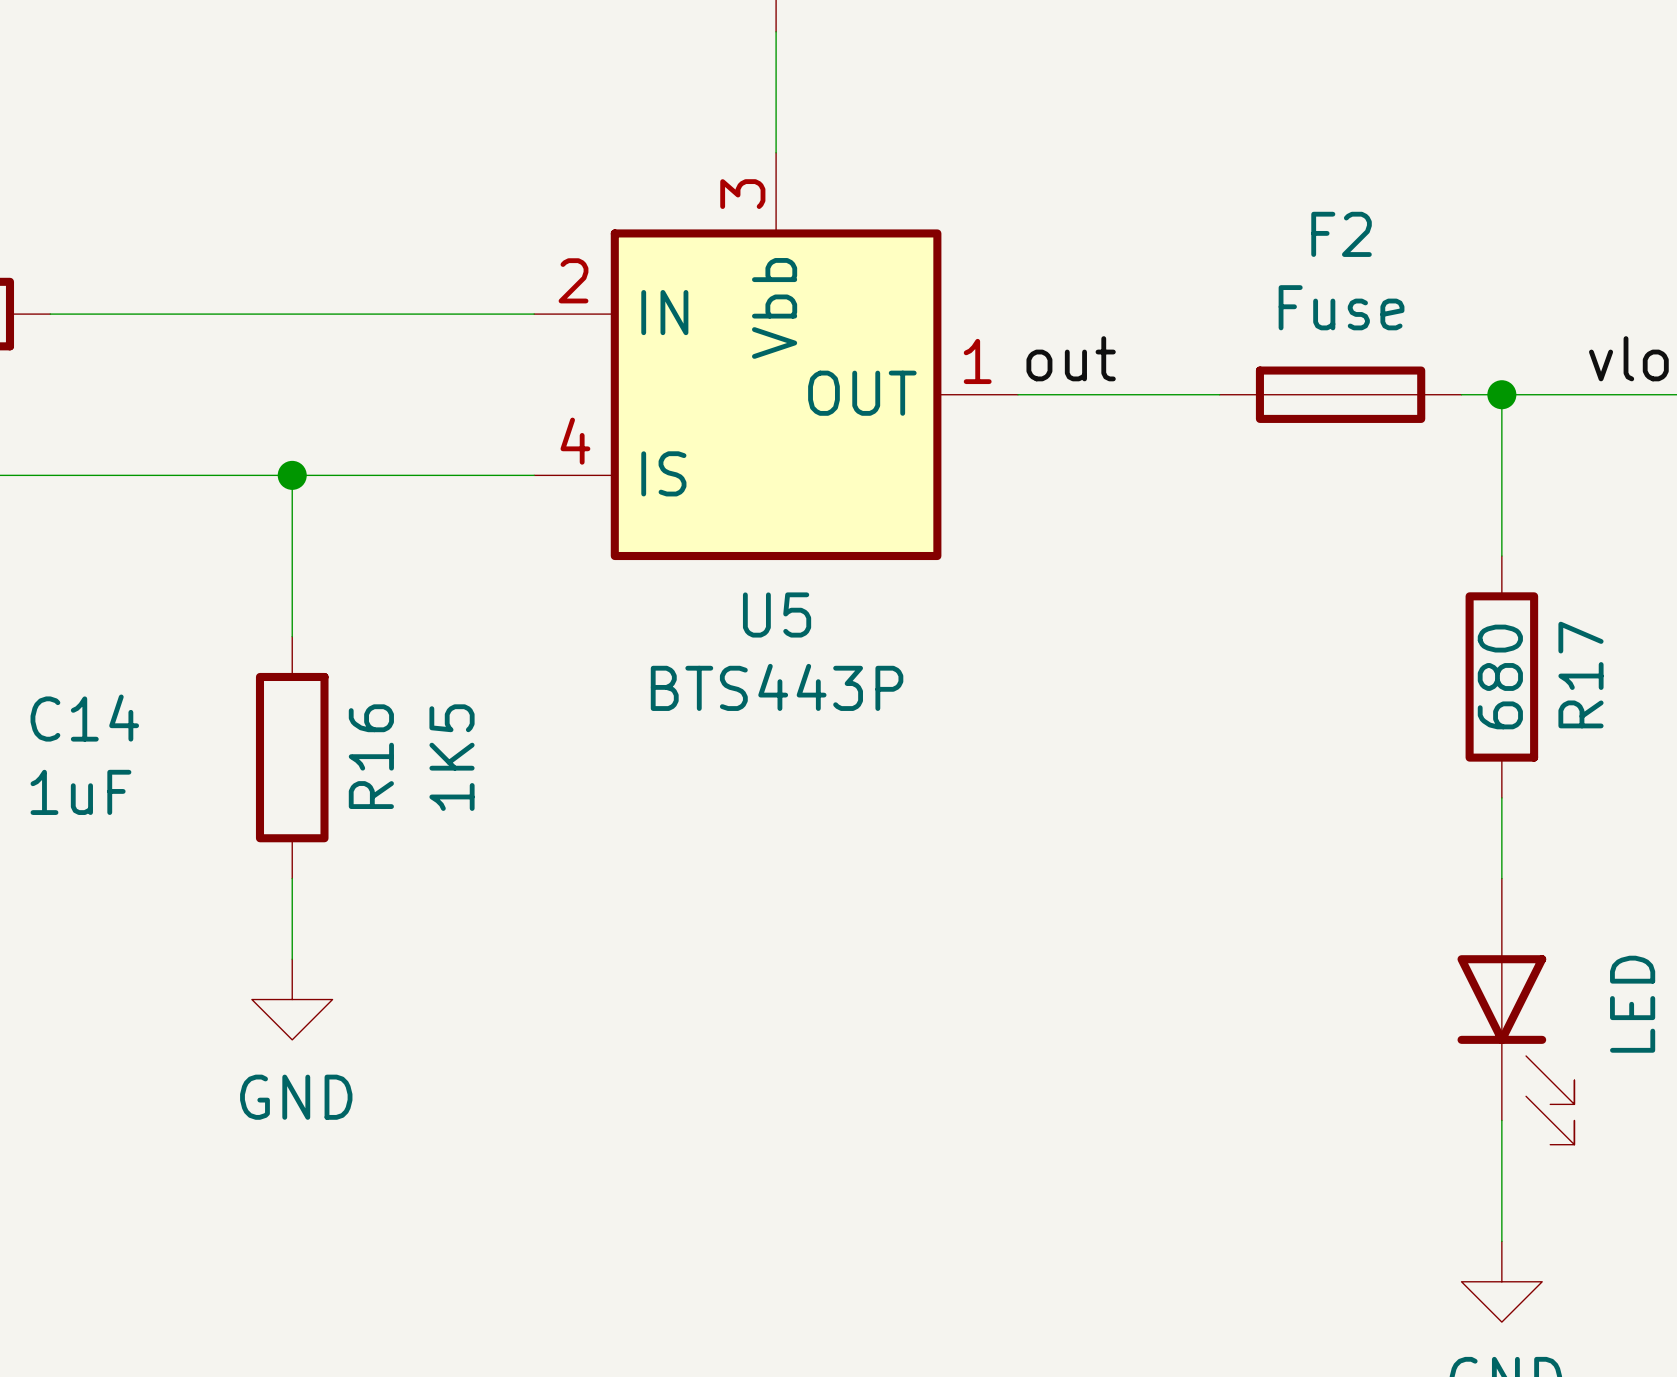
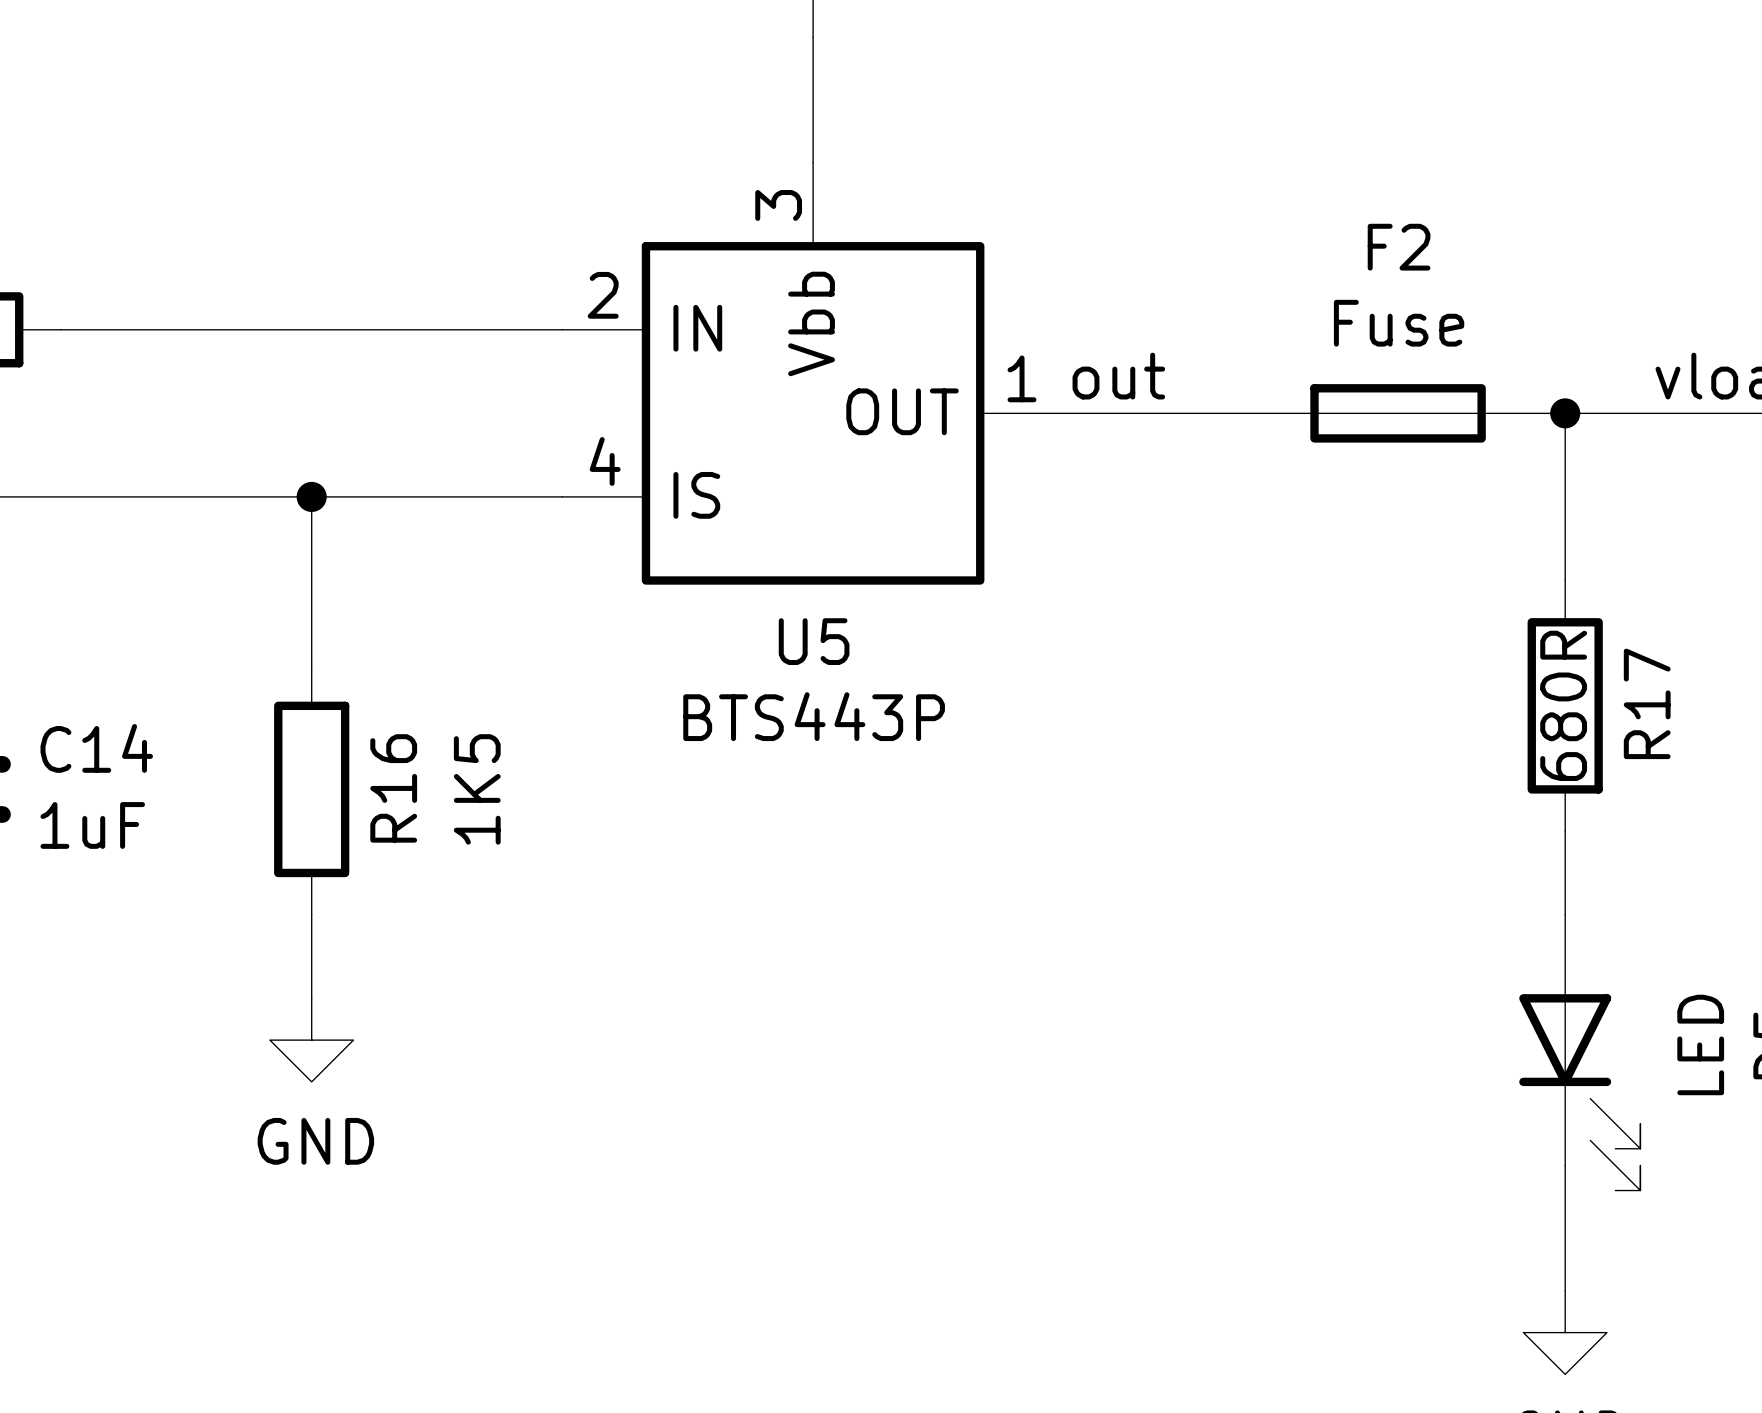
R17 value: 680 (1500, 676) -> 680R (1563, 705)

